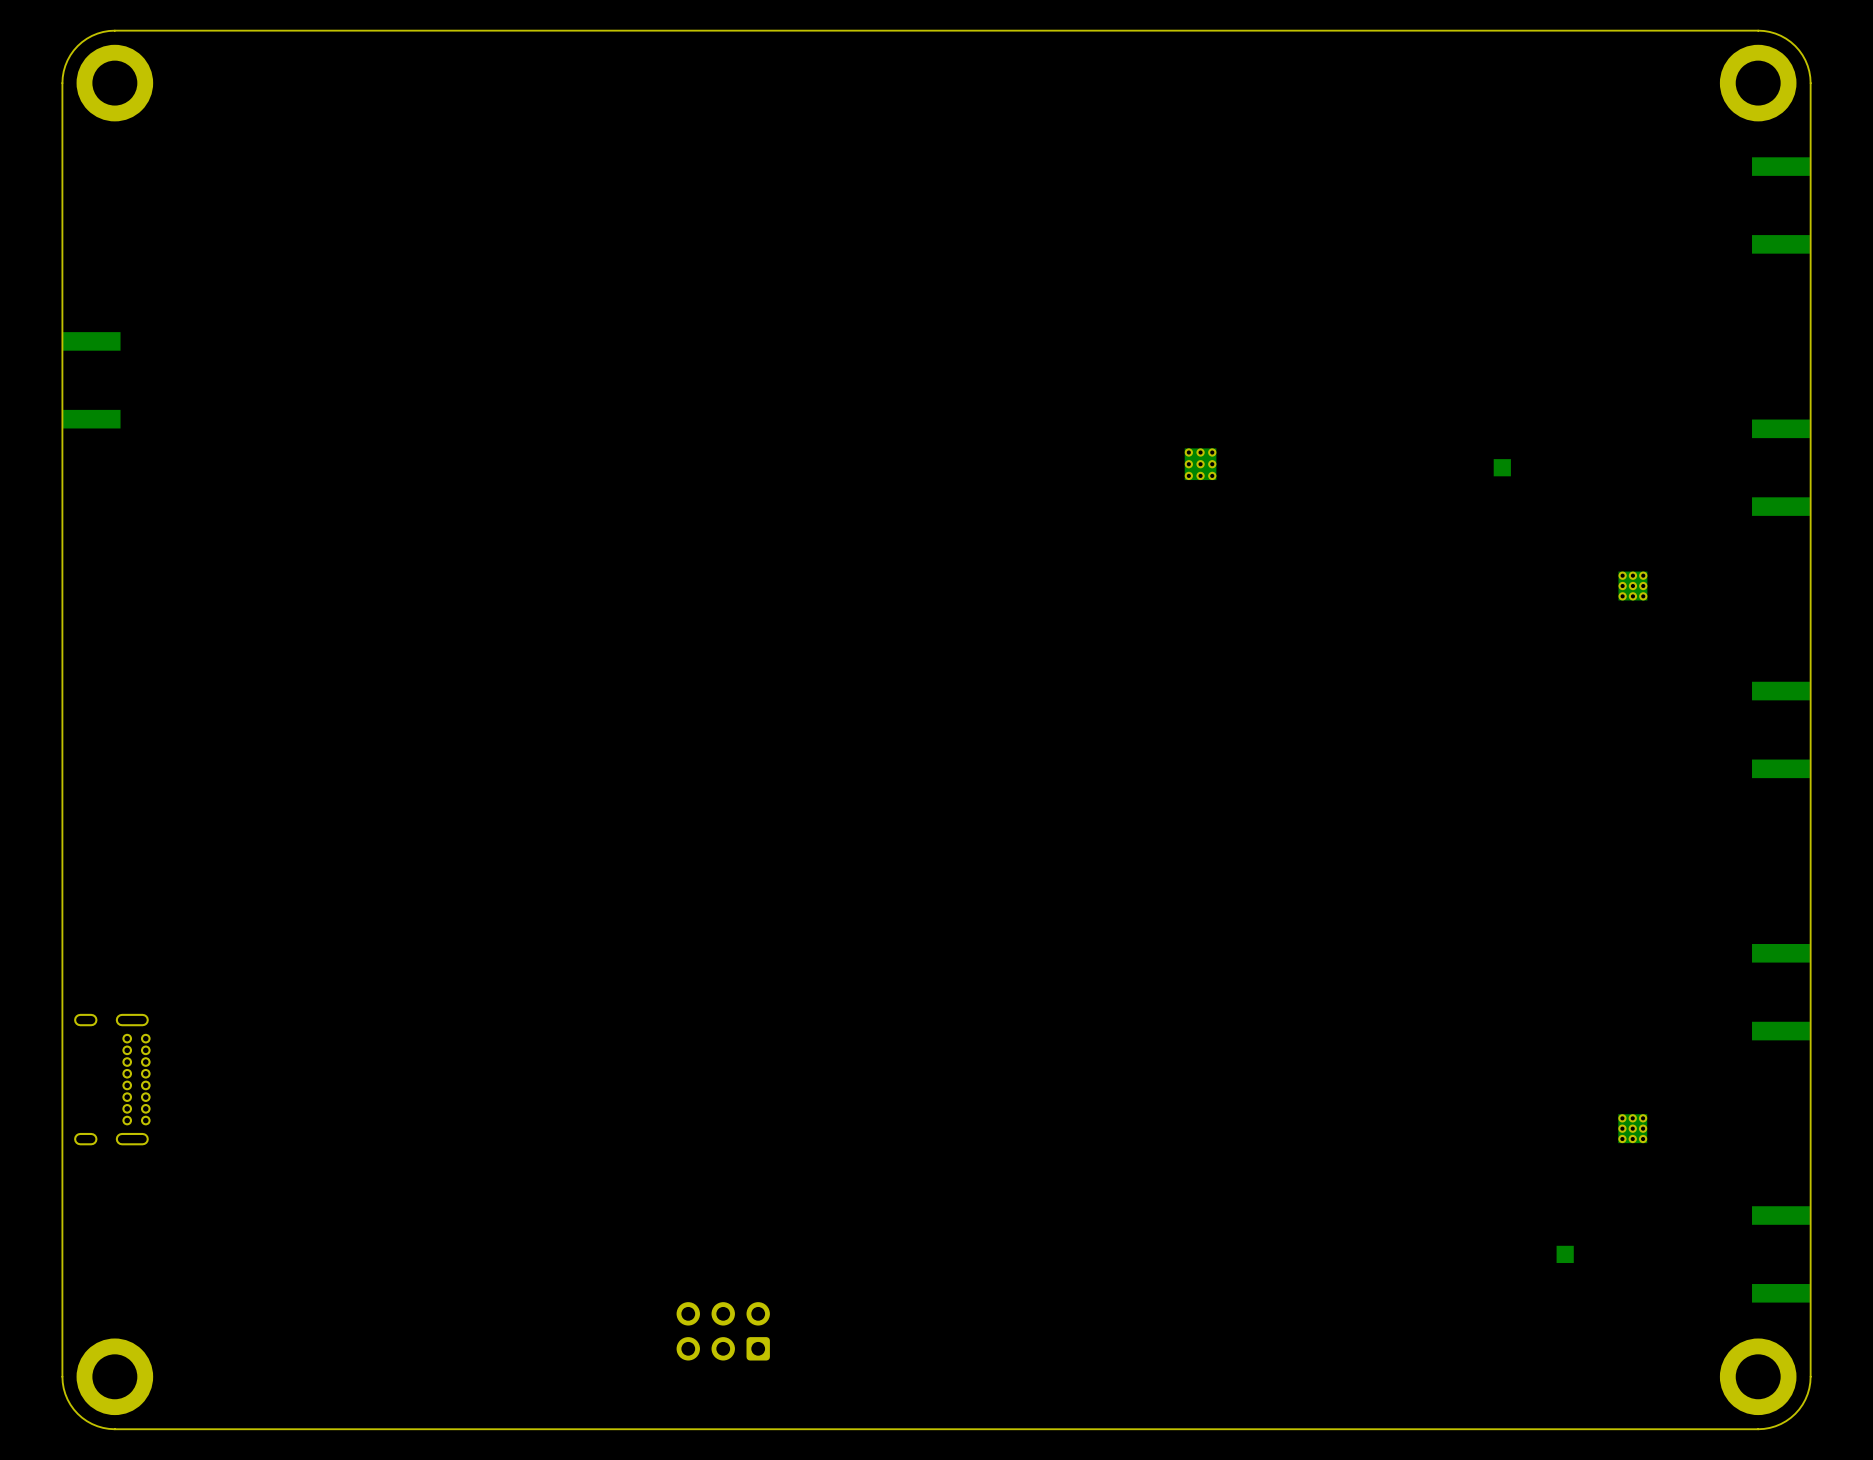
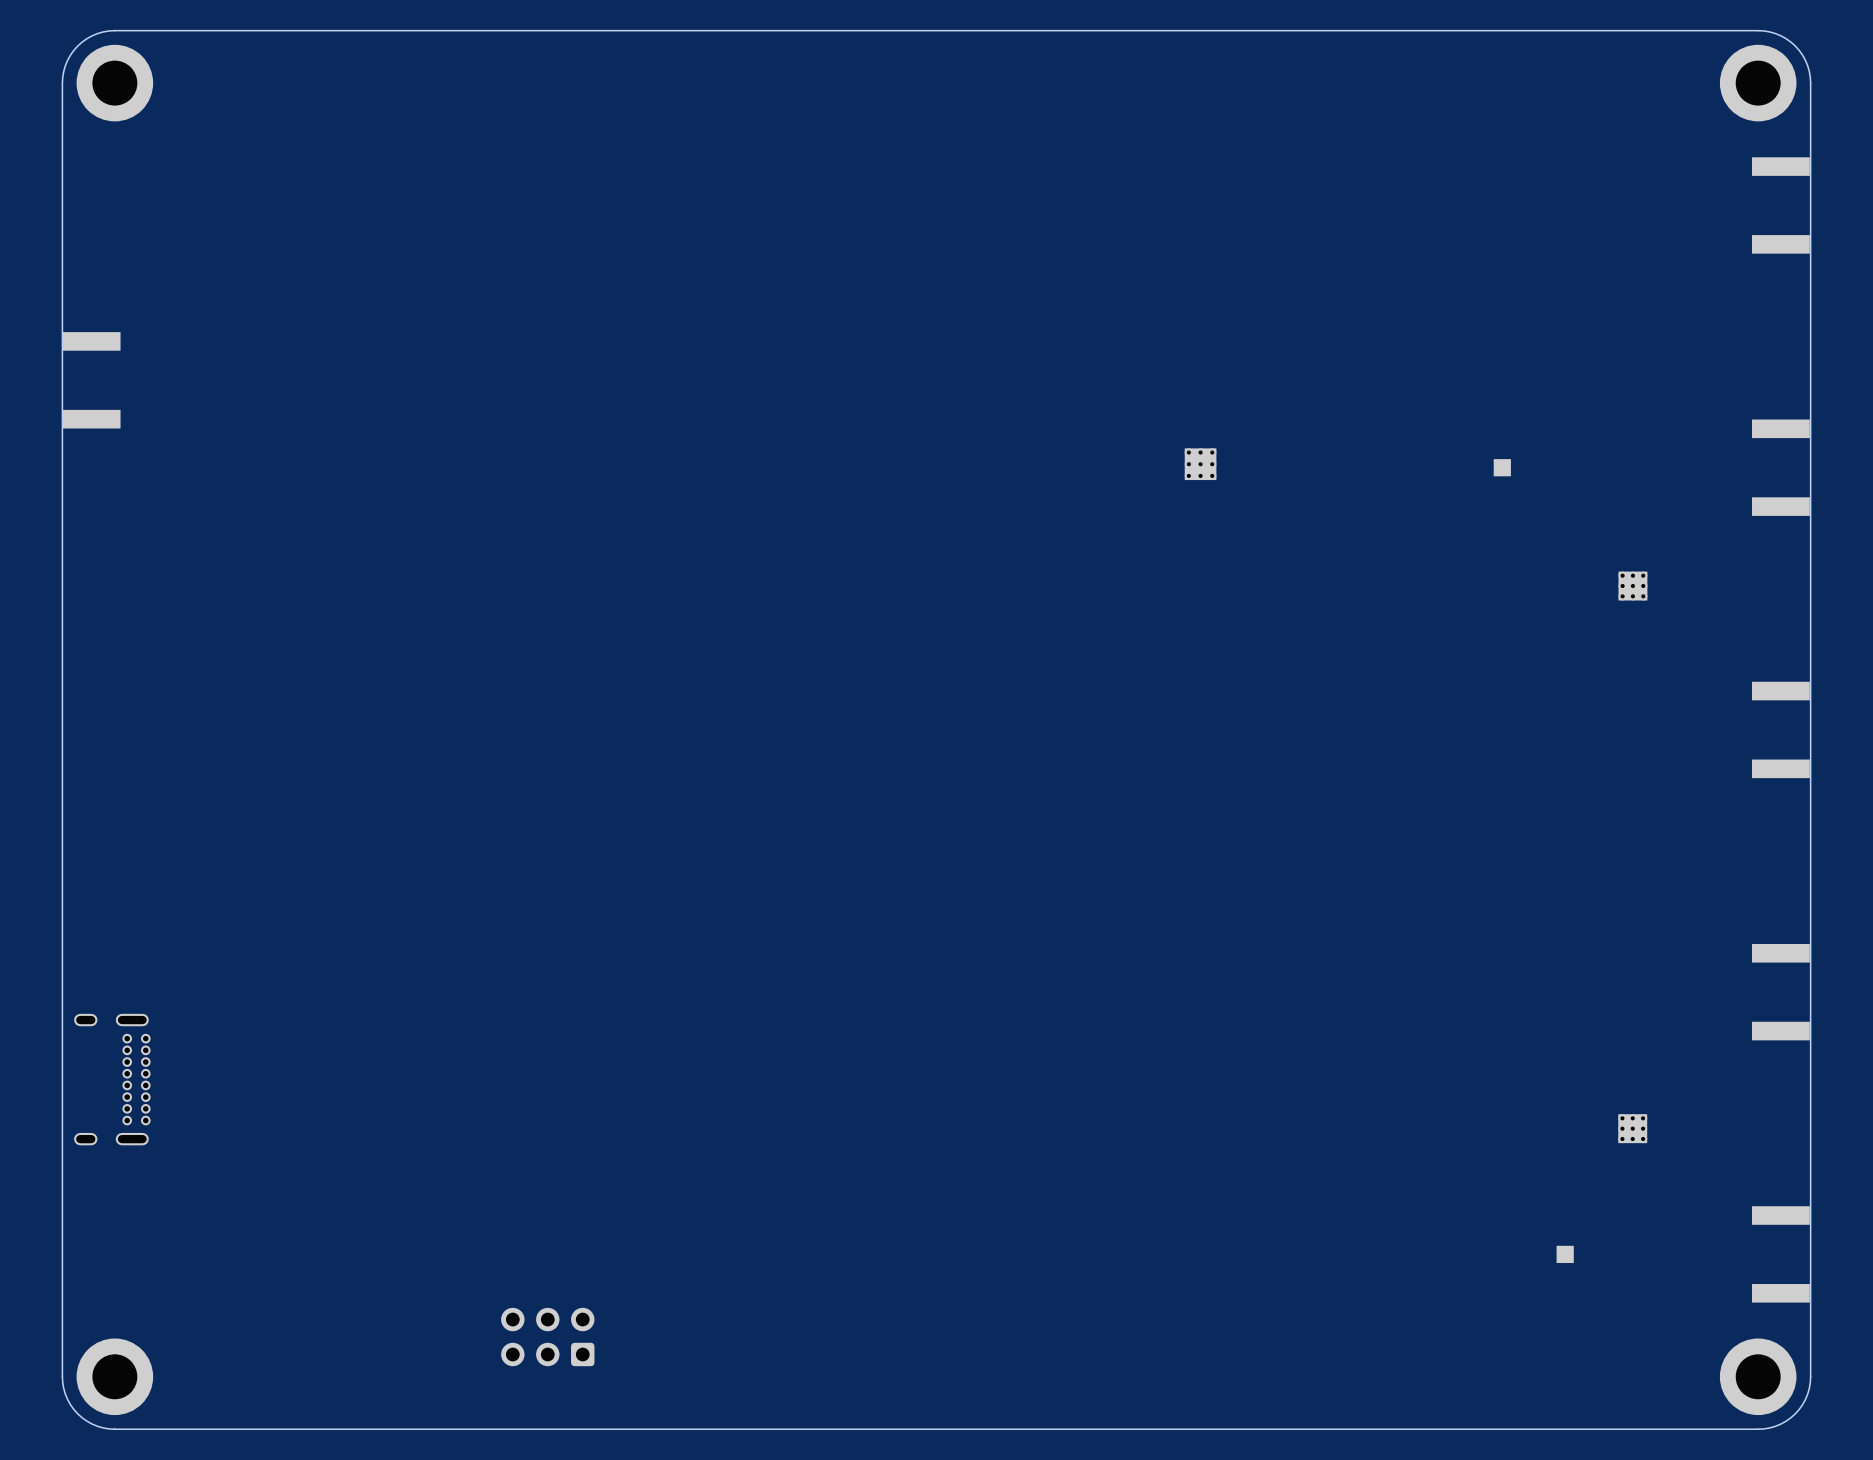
part position: (723, 1331) -> (547, 1337)

